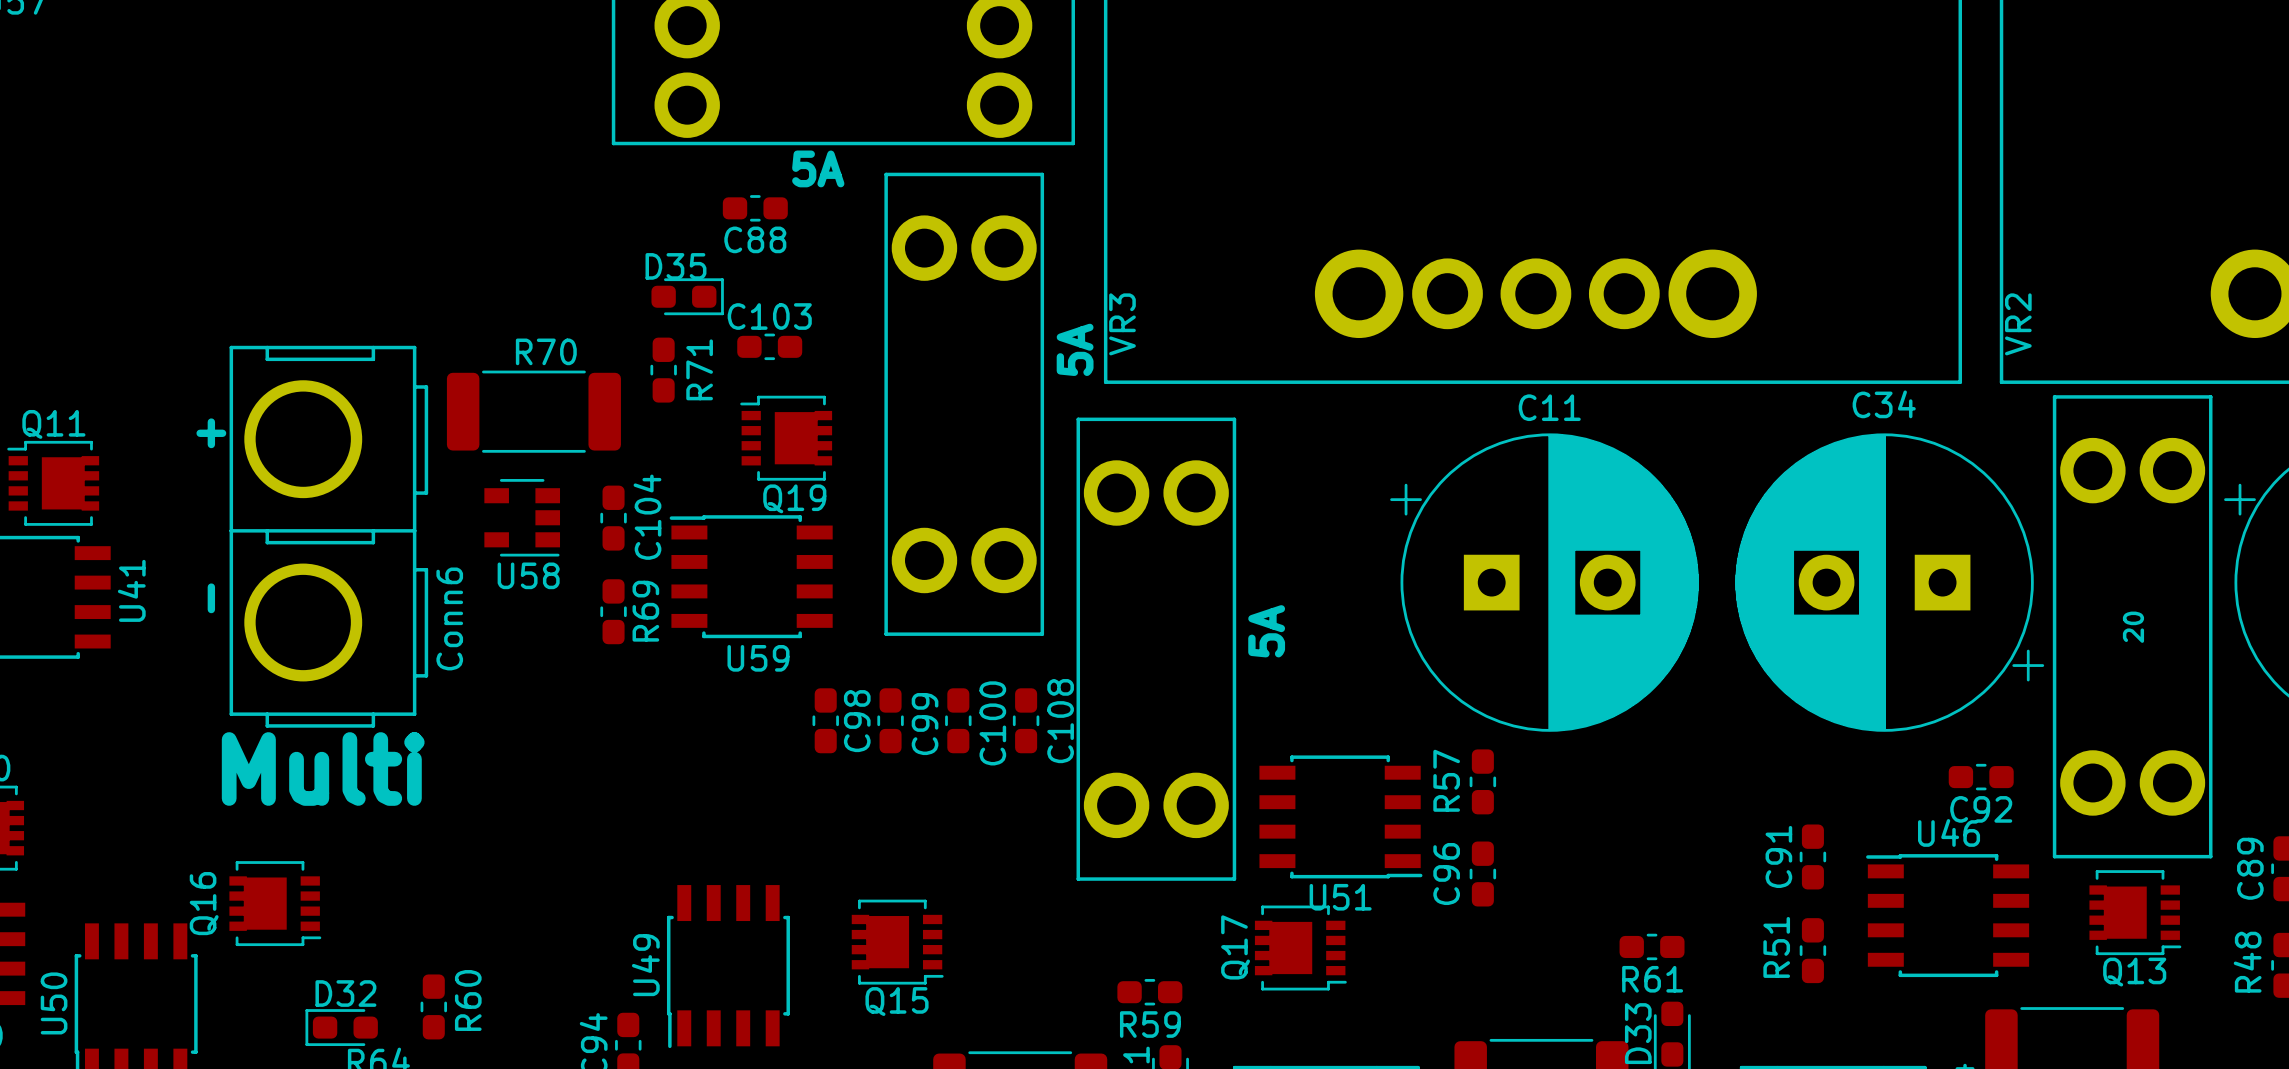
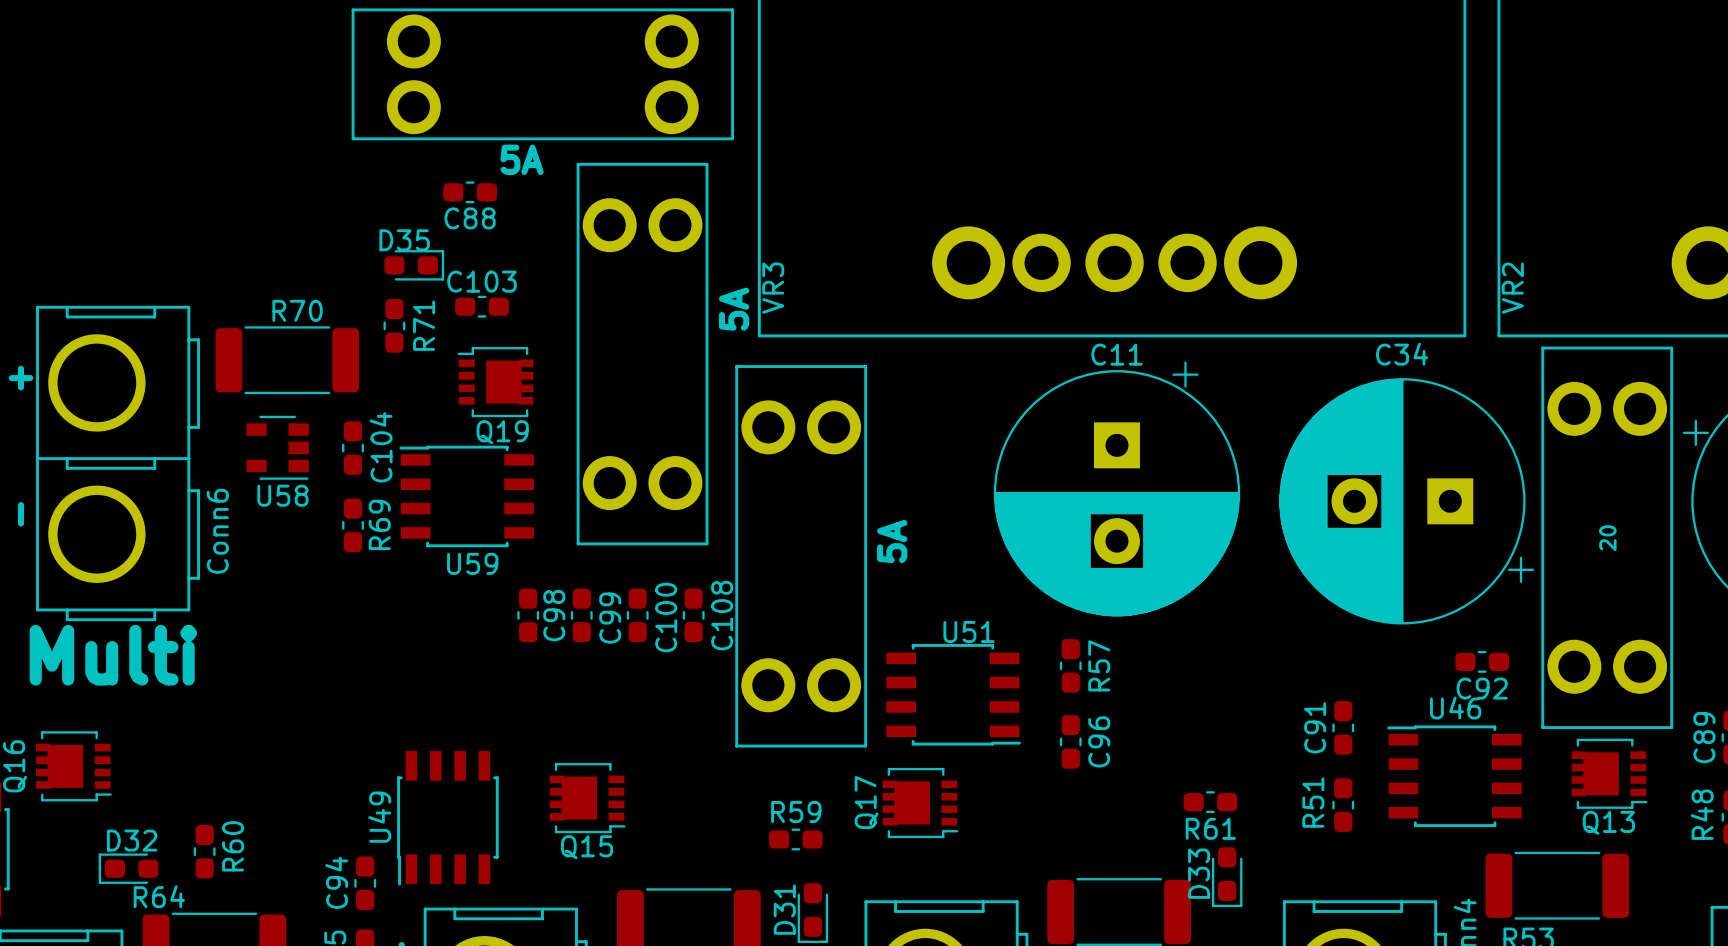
C11 rotation: 0° (1544, 582) -> 90° clockwise (1116, 488)
R57 name position: R57 (1446, 780) -> R57 (1099, 665)
C96 name position: C96 (1446, 874) -> C96 (1099, 741)
U51 name position: U51 (1340, 897) -> U51 (969, 631)
R59 name position: R59 (1150, 1024) -> R59 (796, 812)

